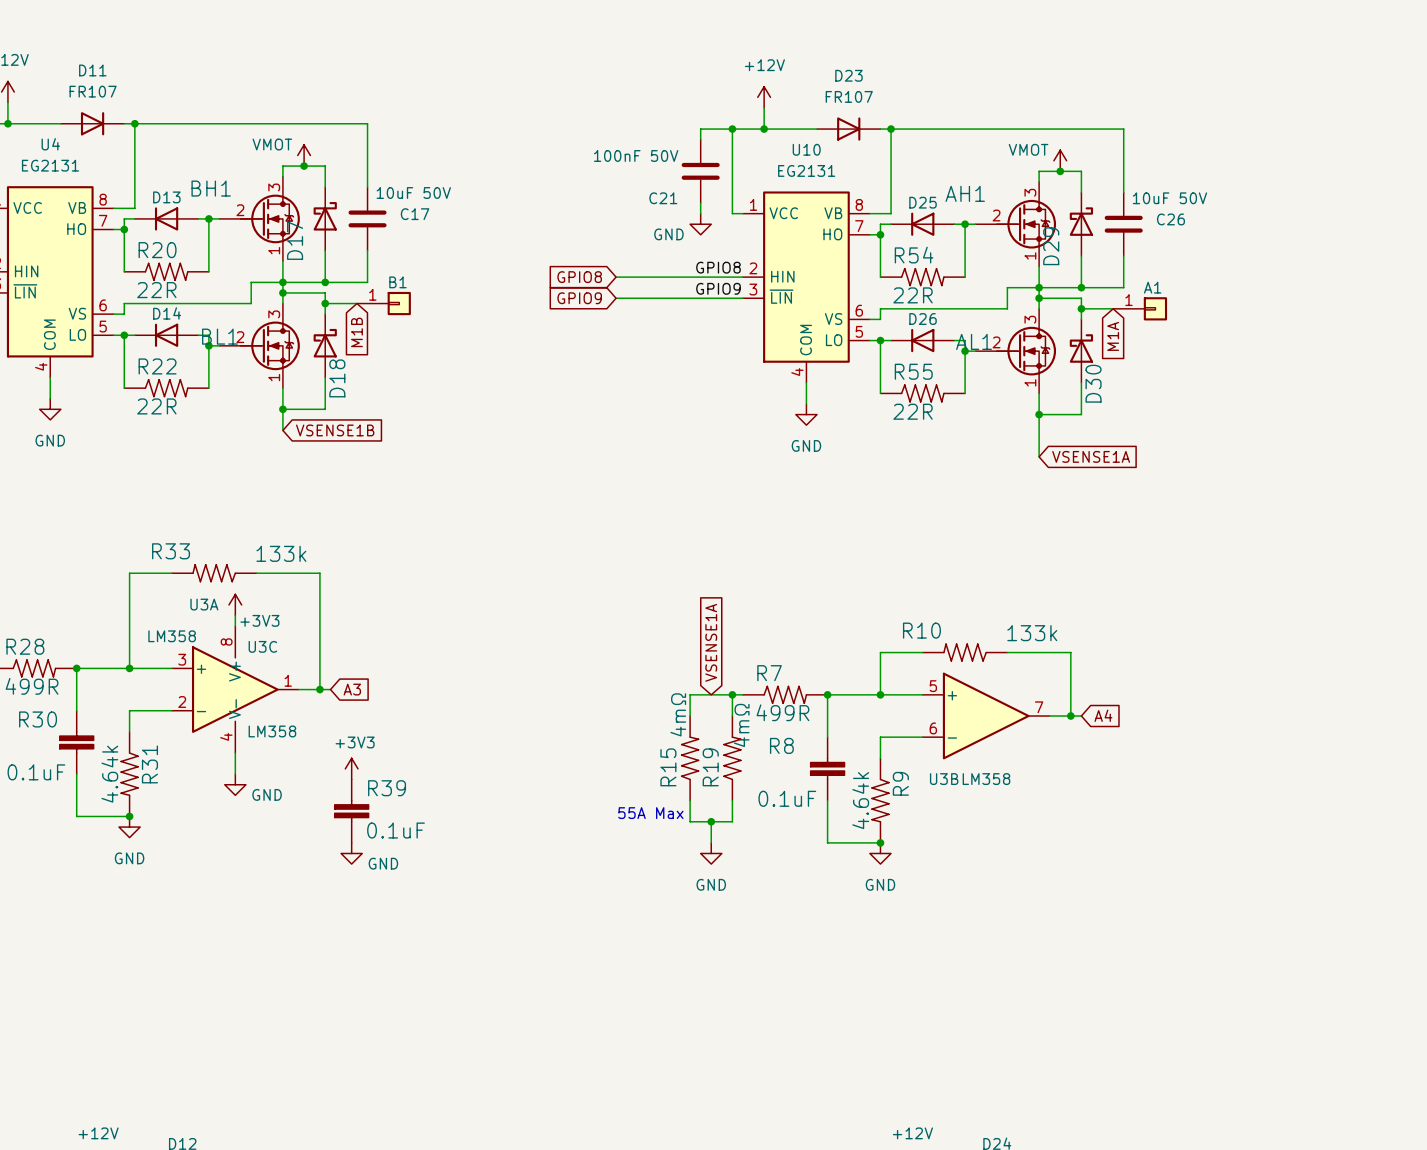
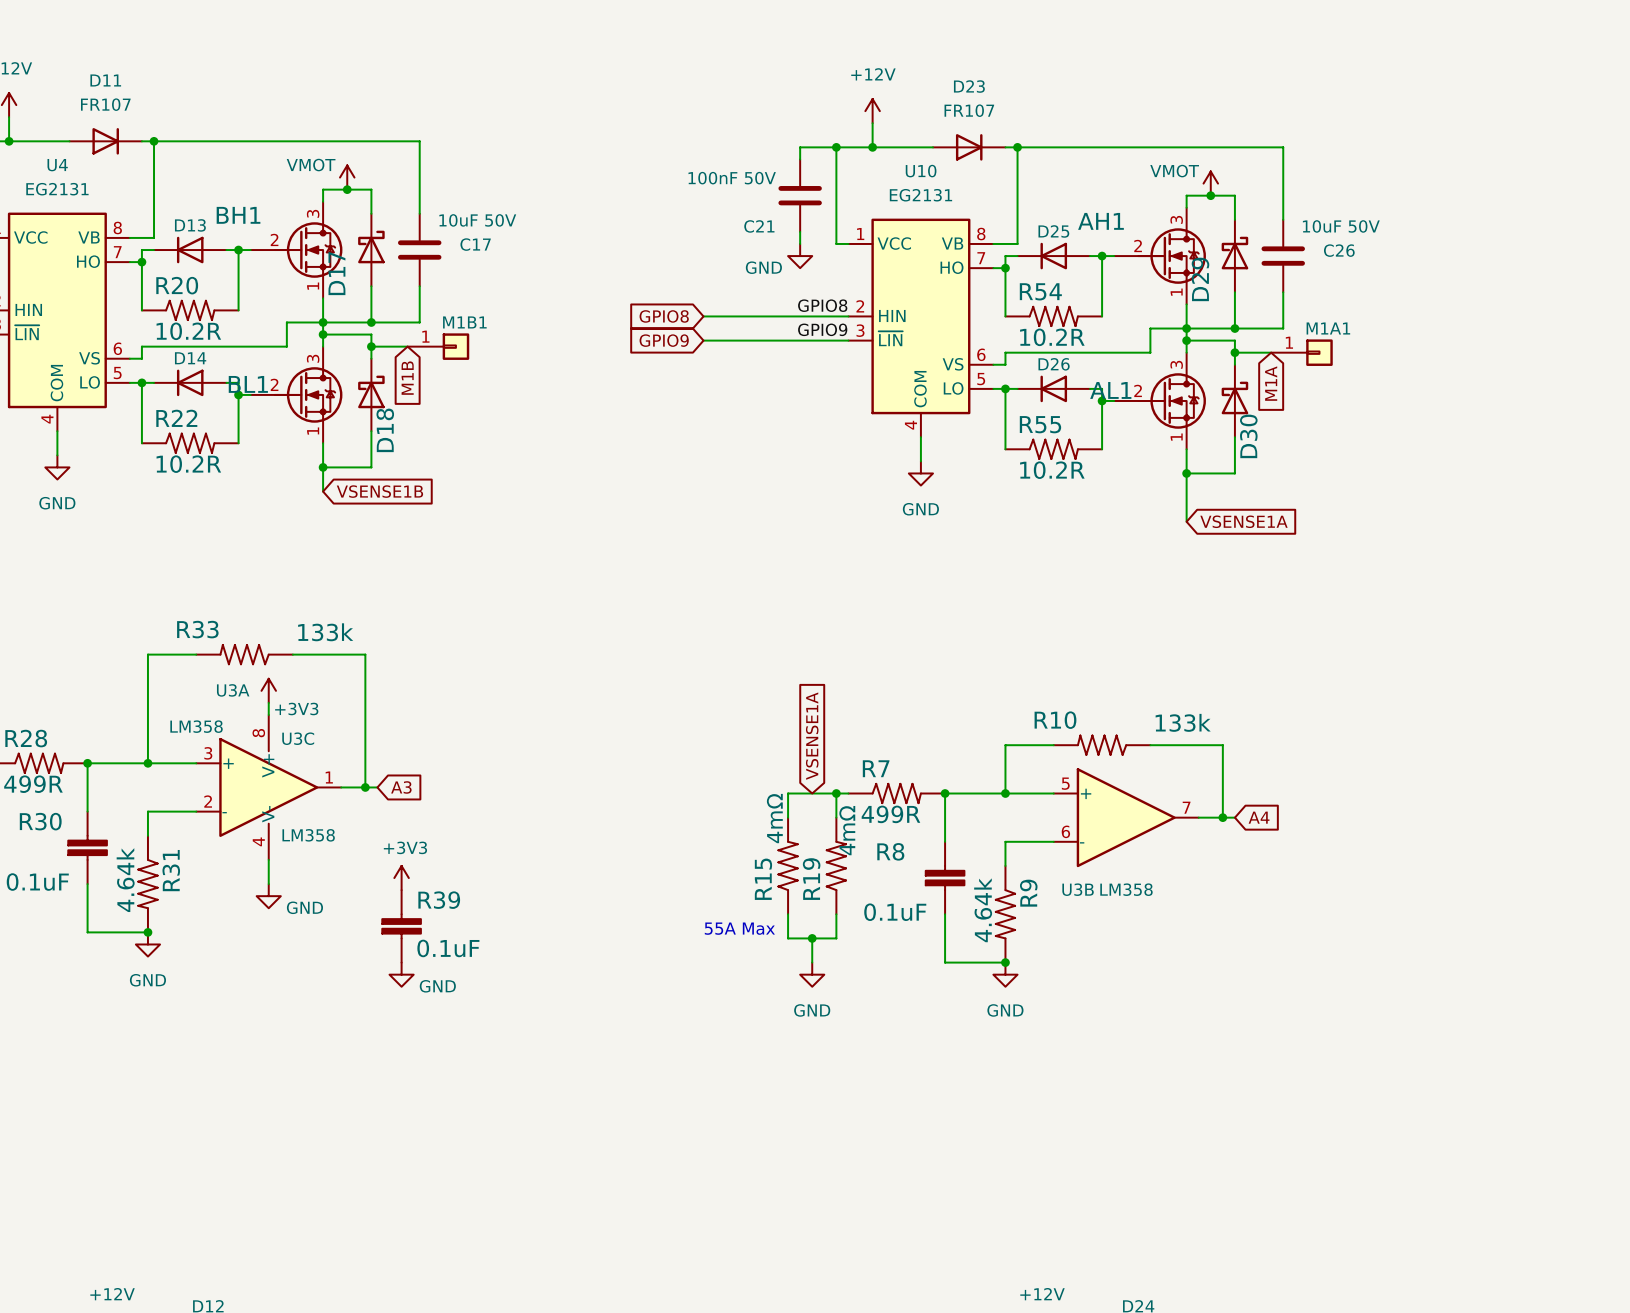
B1 name: B1 (397, 282) -> M1B1 (464, 322)
A1 name: A1 (1152, 287) -> M1A1 (1328, 328)
R20 value: 22R (156, 290) -> 10.2R (188, 331)
R54 value: 22R (913, 295) -> 10.2R (1052, 337)
R22 value: 22R (156, 406) -> 10.2R (188, 464)
R55 value: 22R (913, 411) -> 10.2R (1052, 470)

